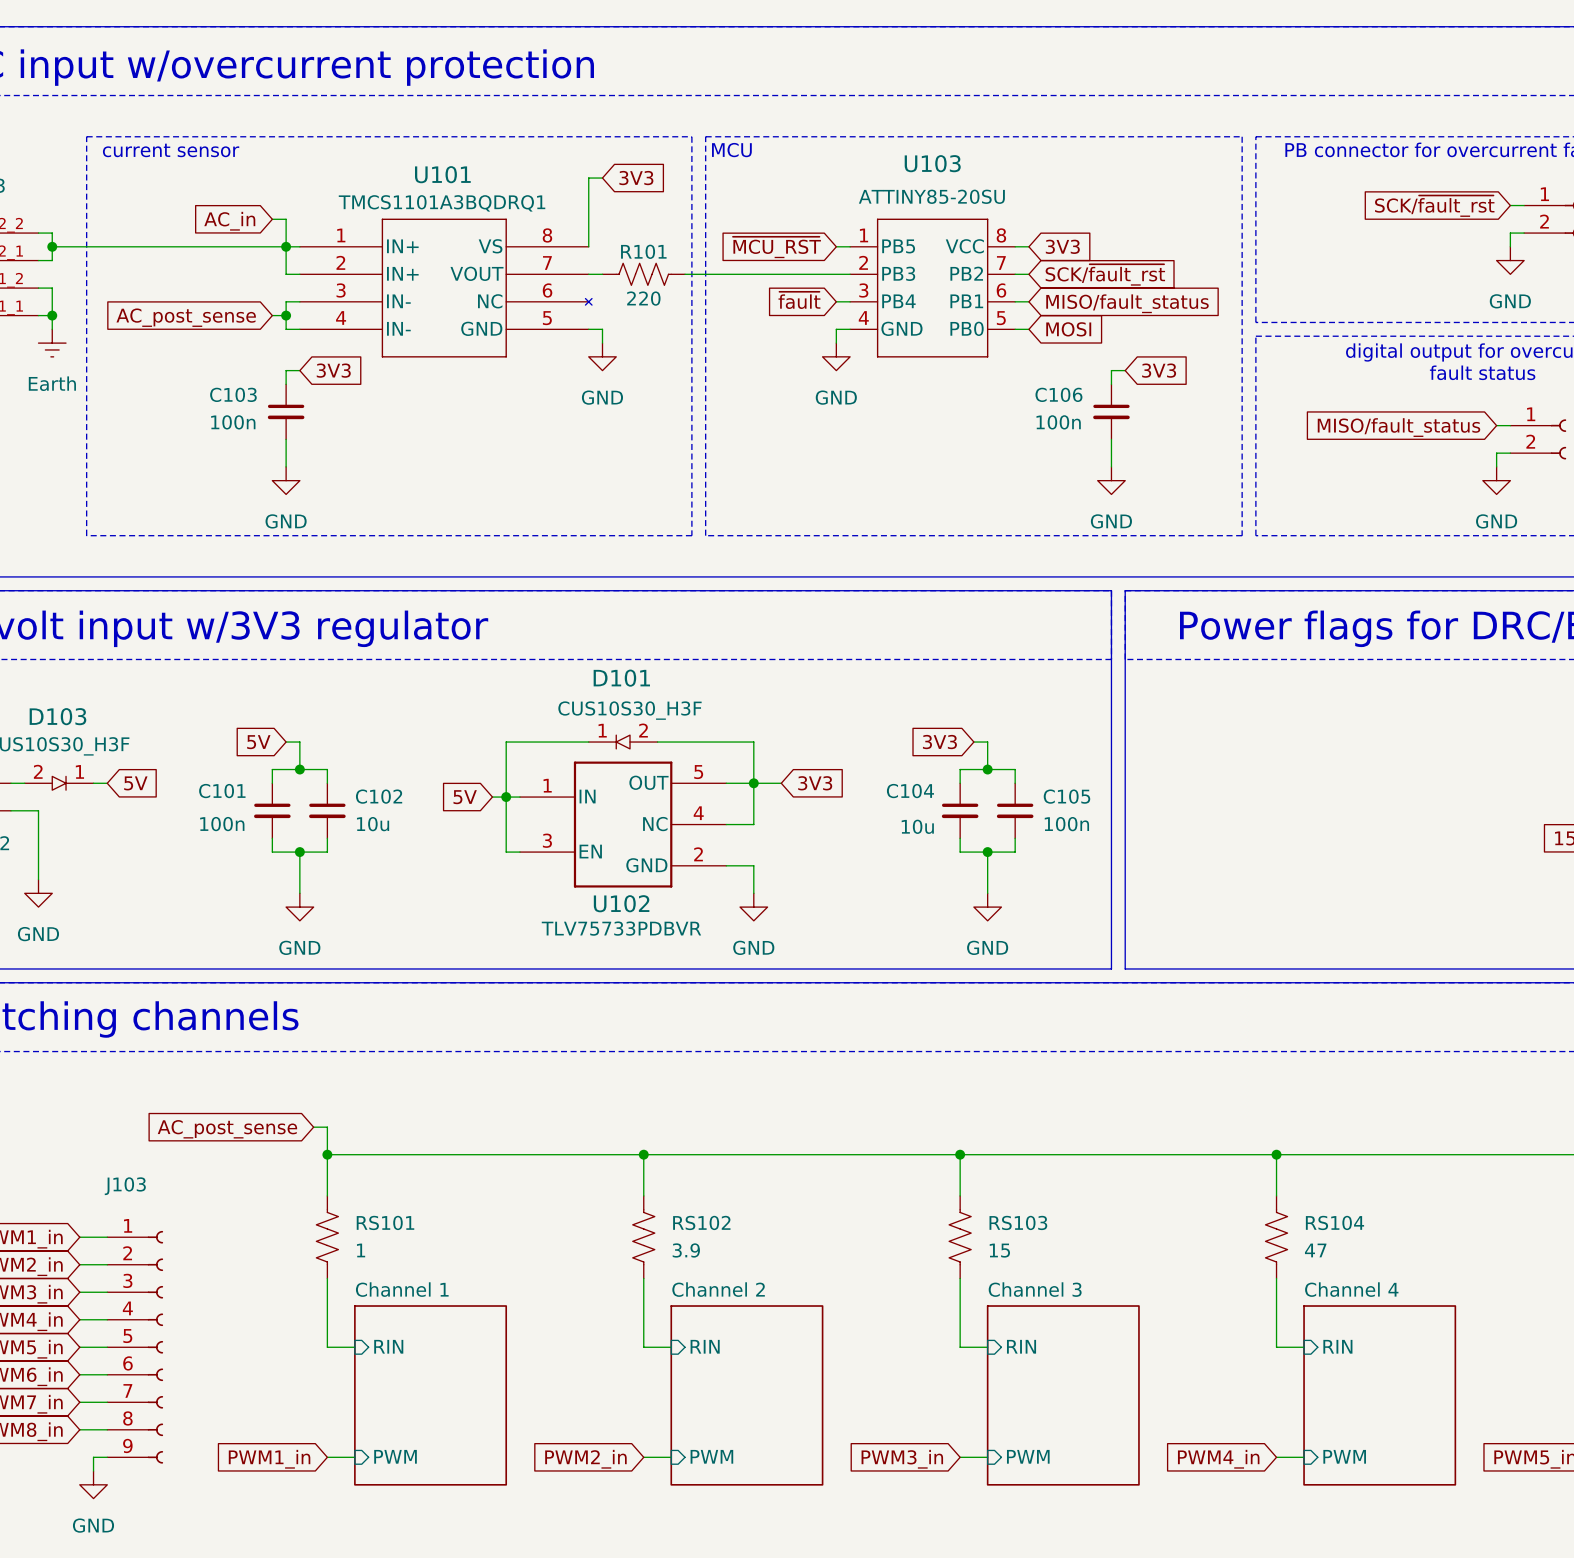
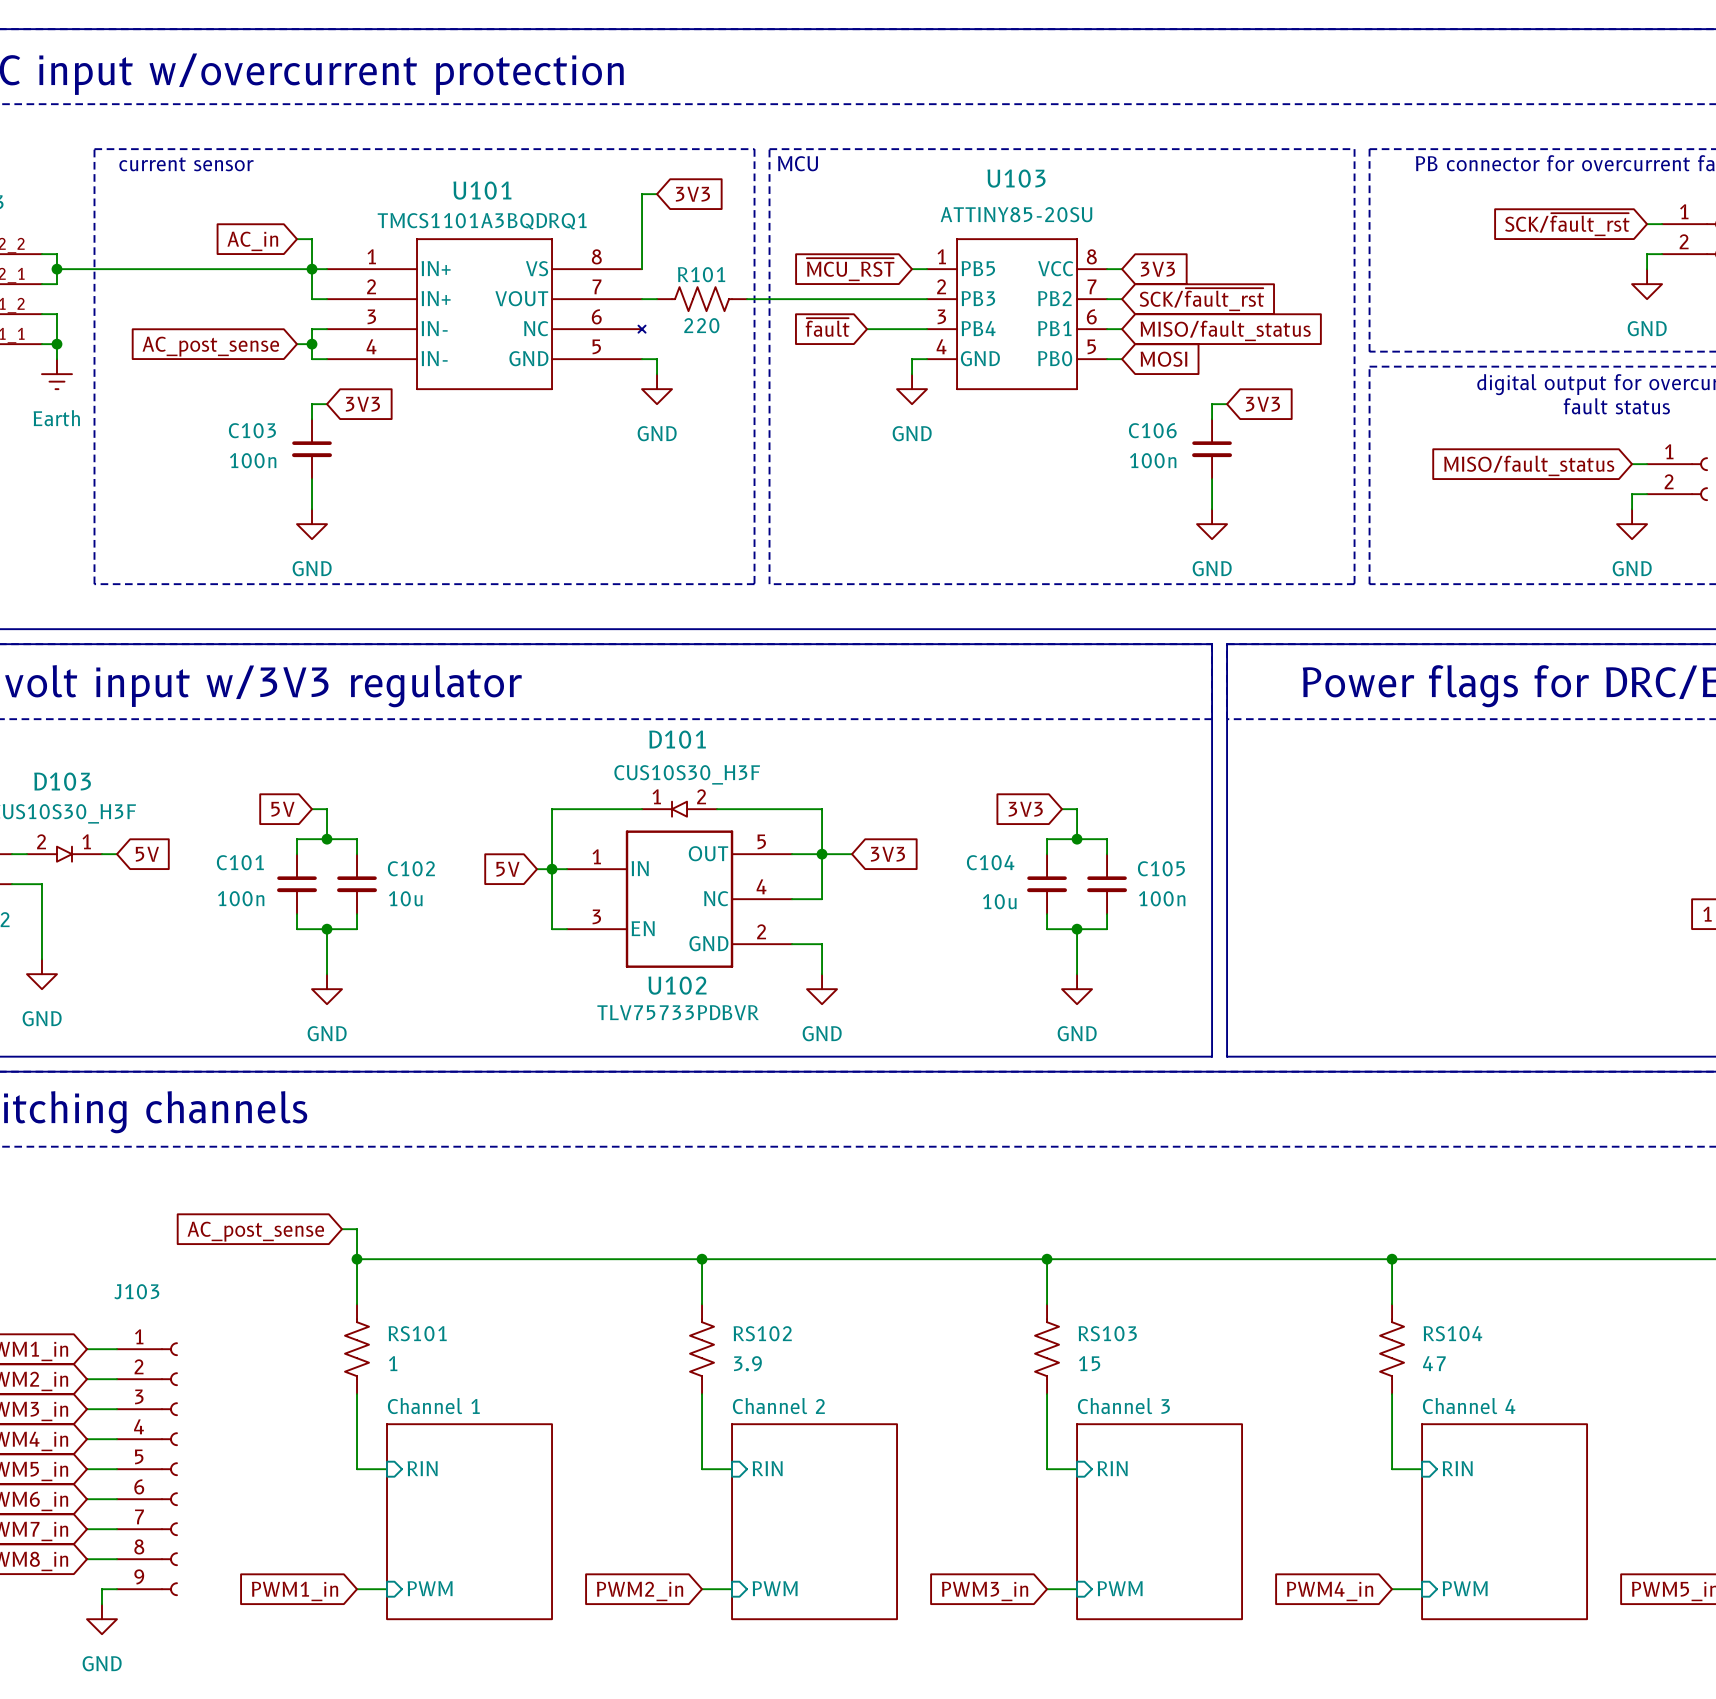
global label position: ~{fault} (799, 300) -> ~{fault} (827, 327)
wire: none -> (867, 329) (912, 329)

